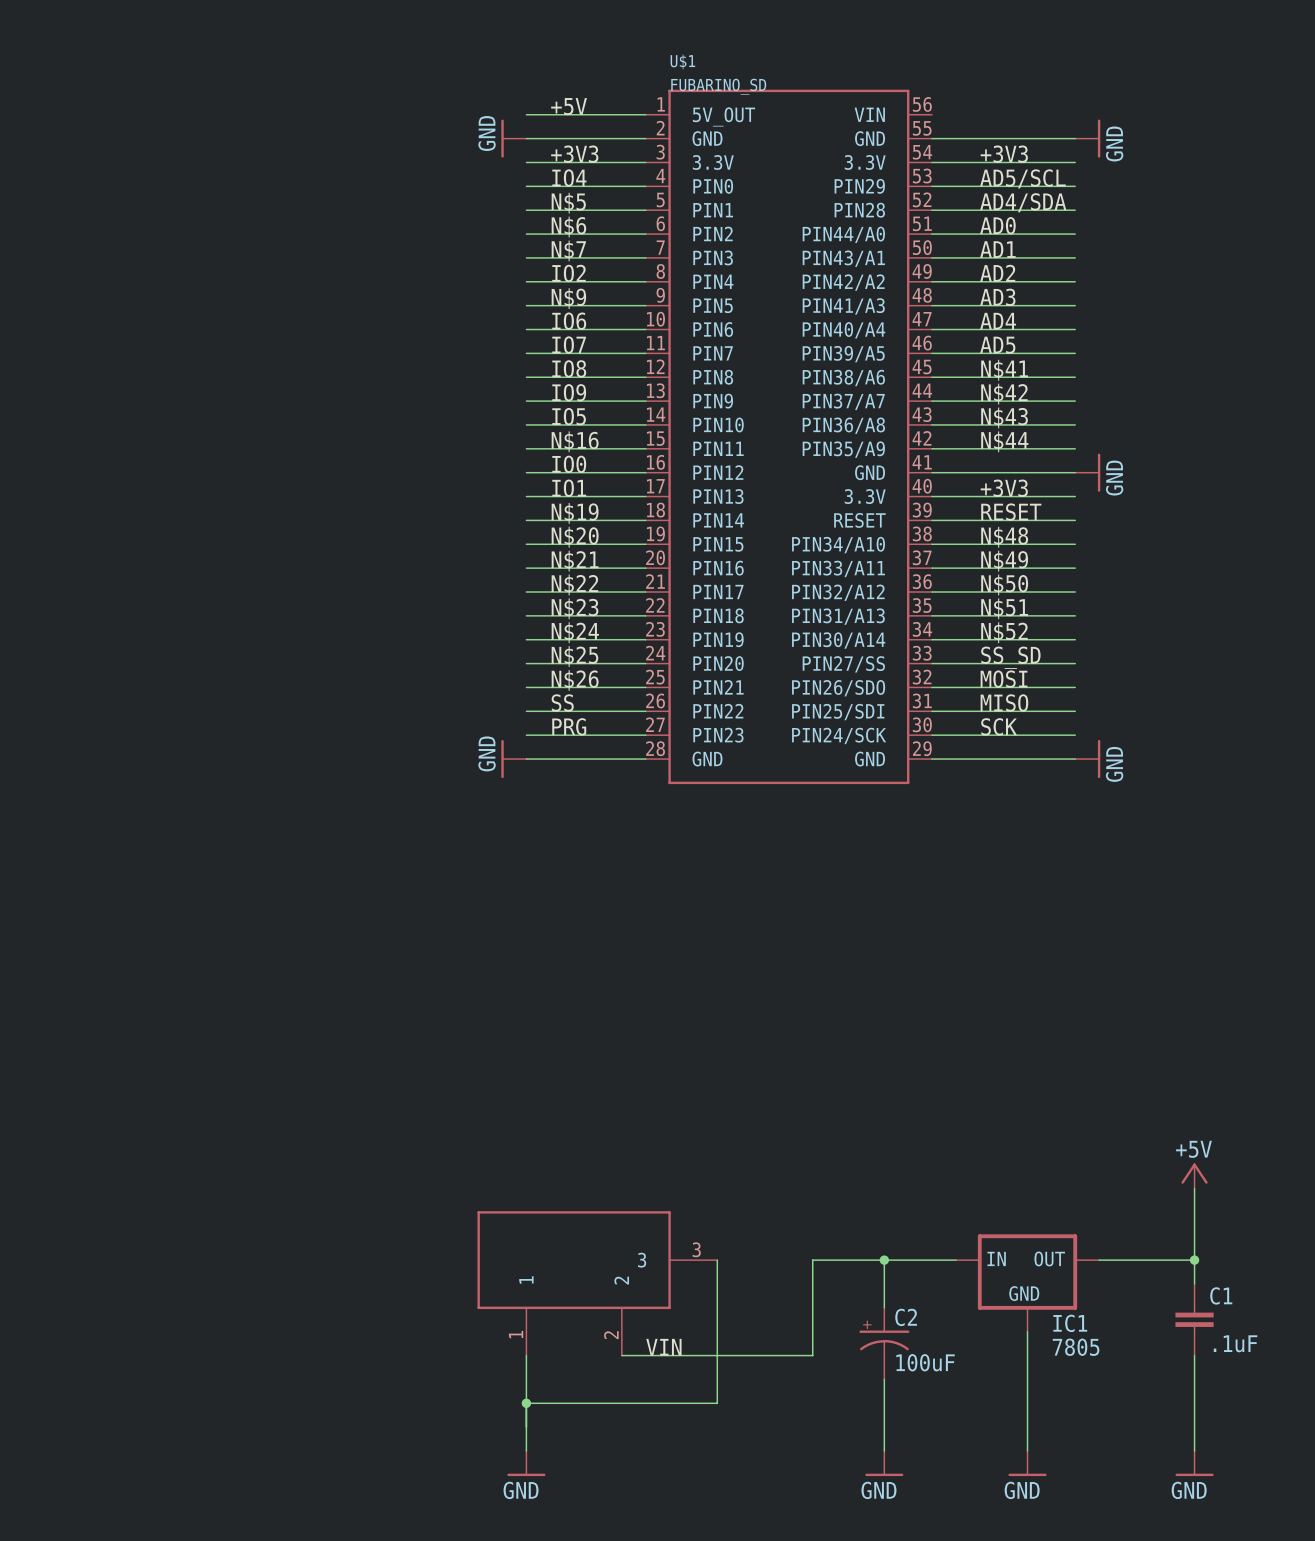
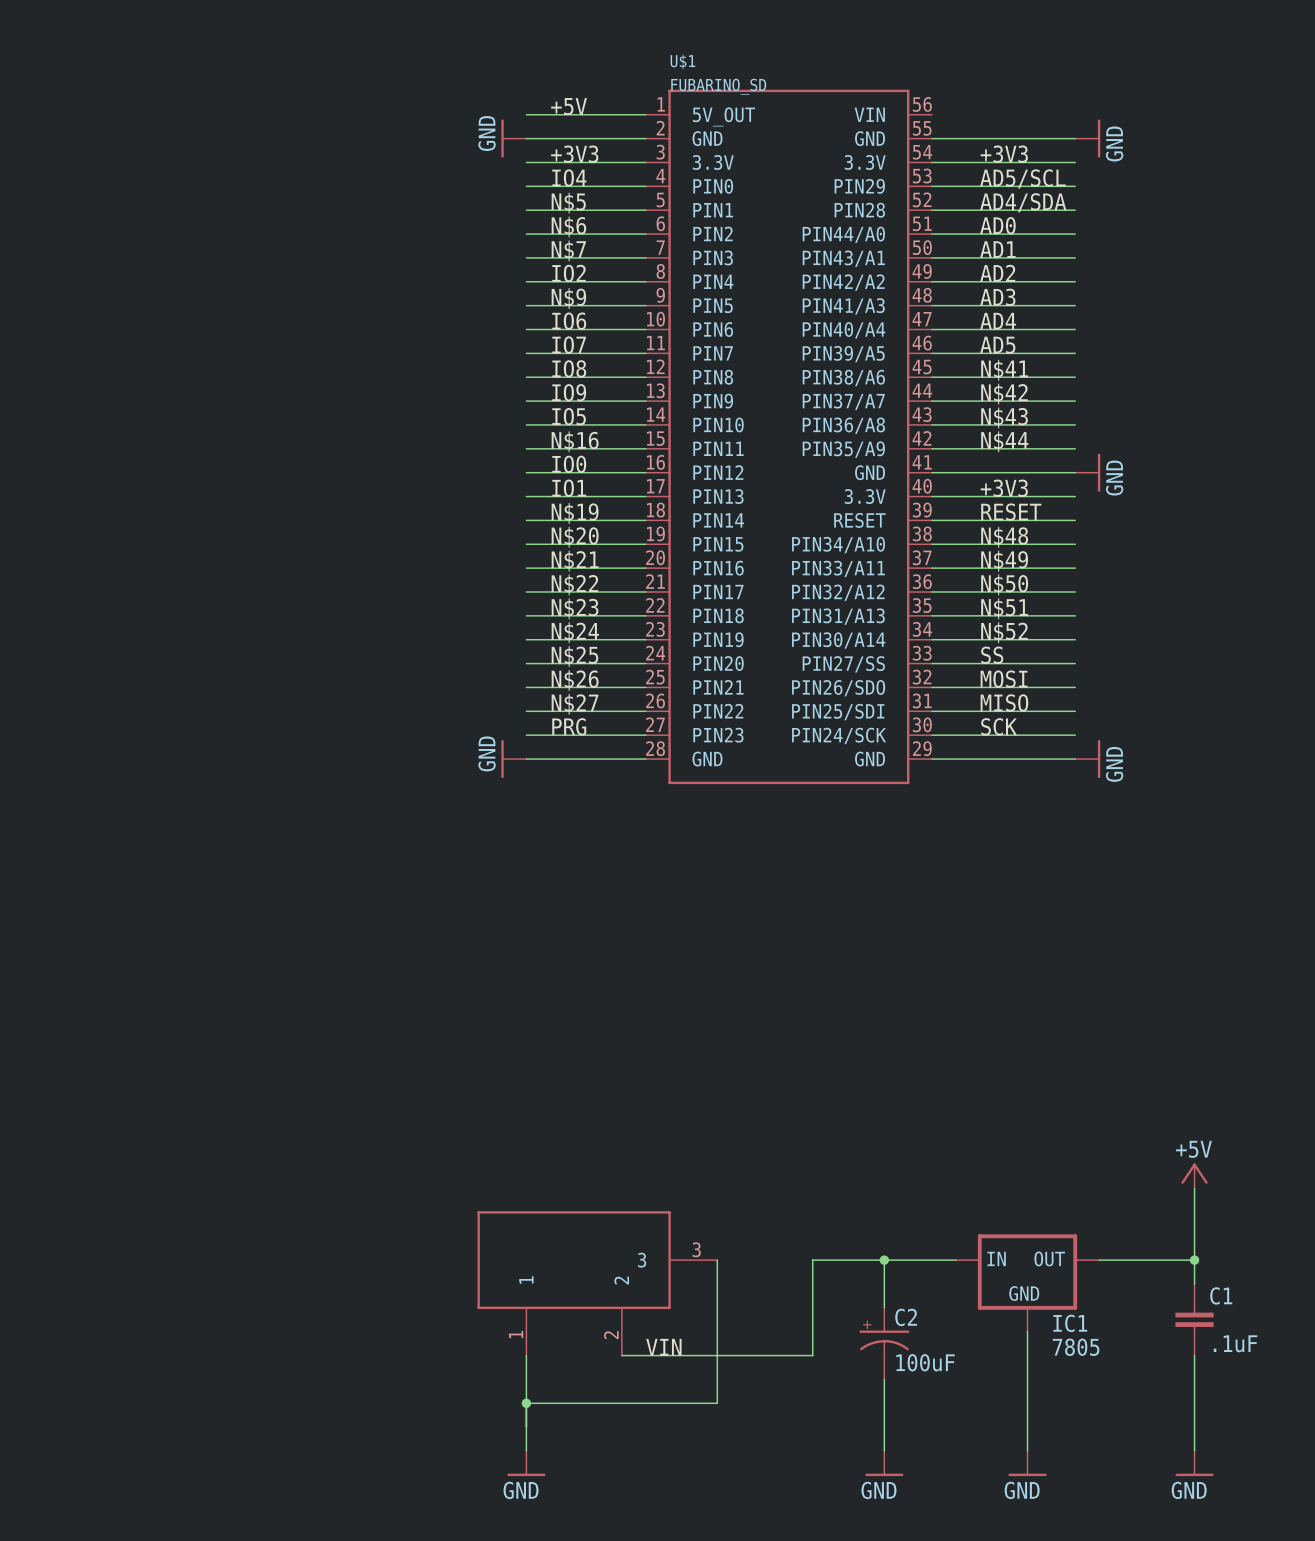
label: SS_SD (1010, 657) -> SS (992, 655)
label: SS (562, 702) -> N$27 (575, 704)

